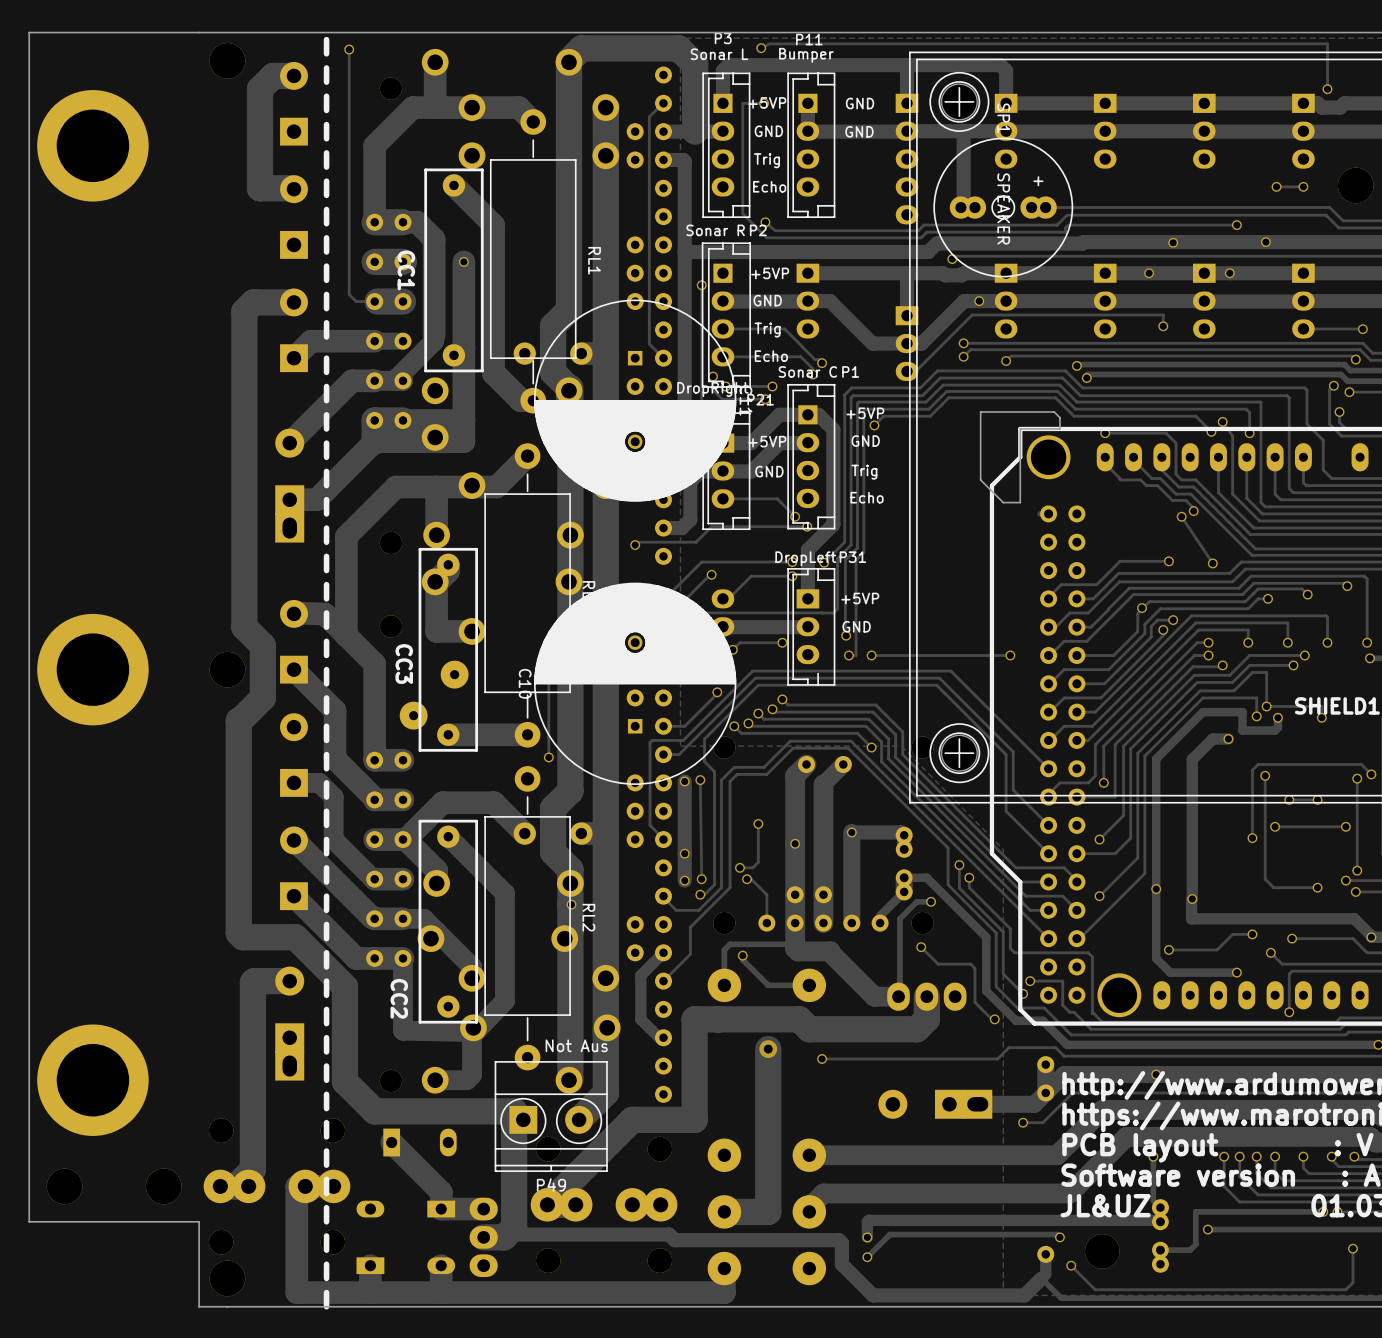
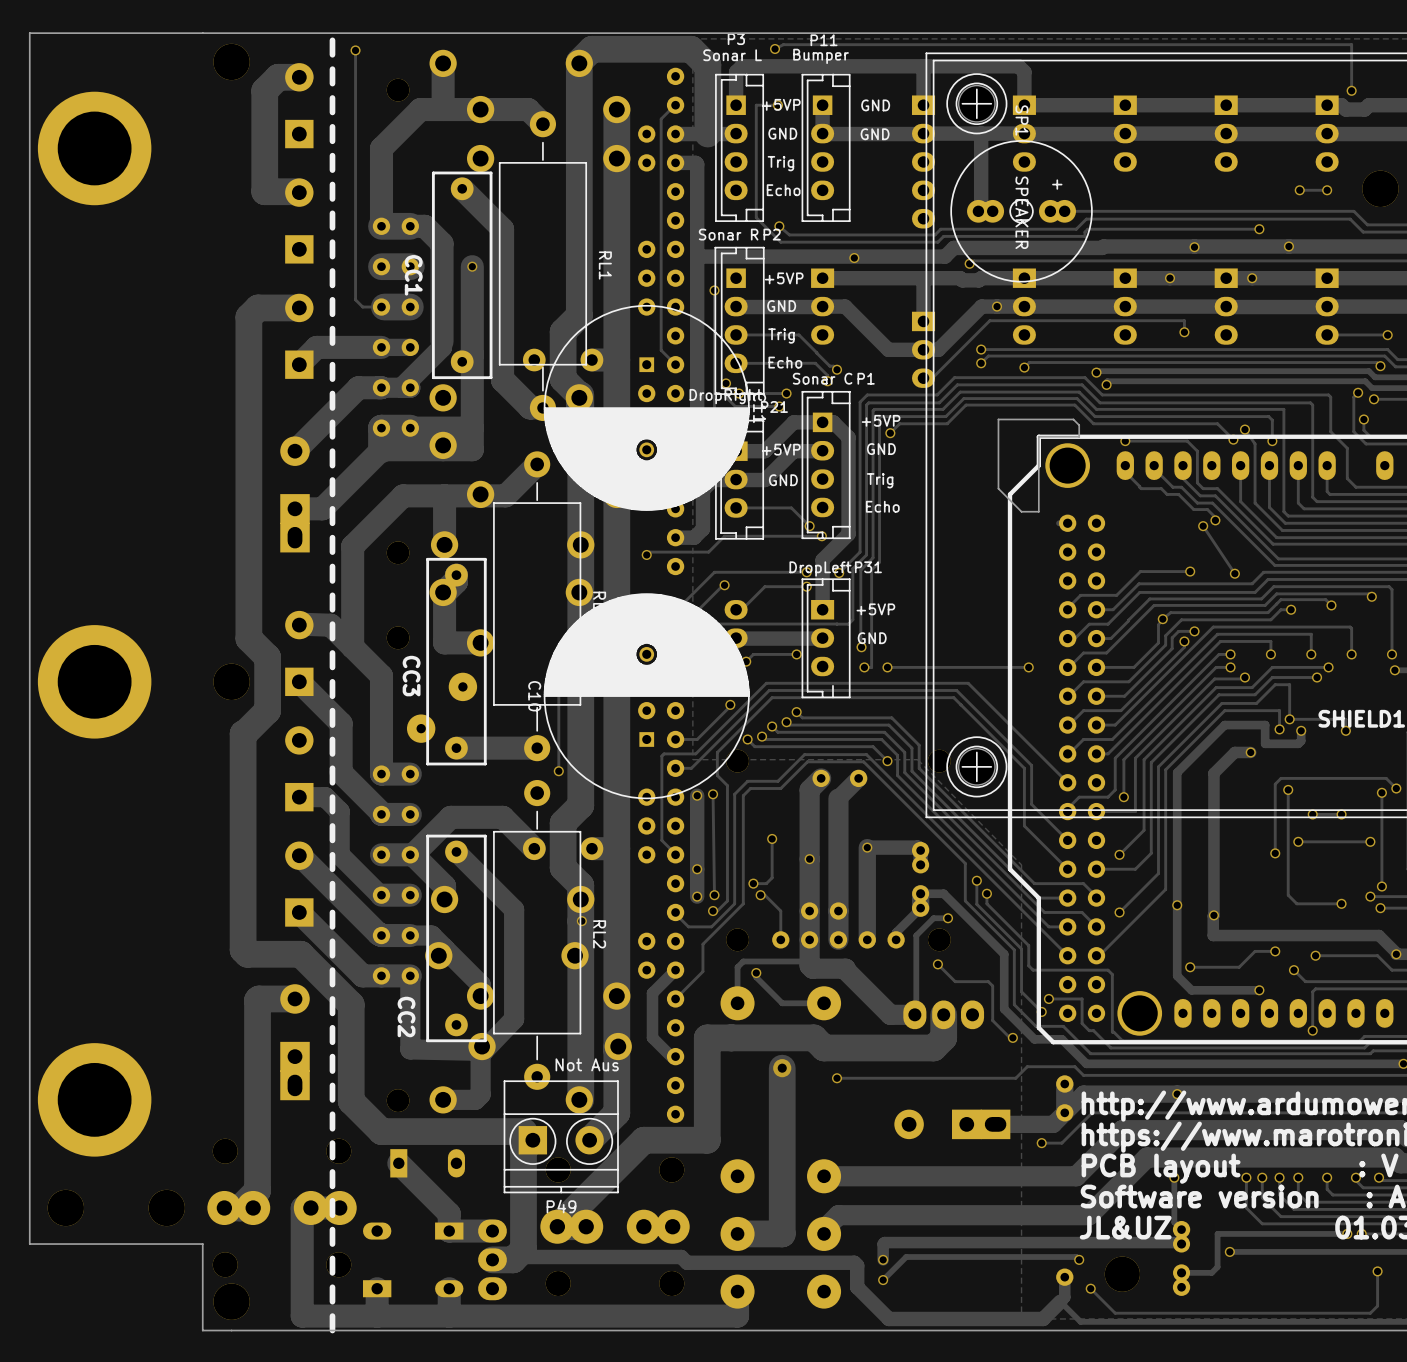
via: none -> (854, 258)

